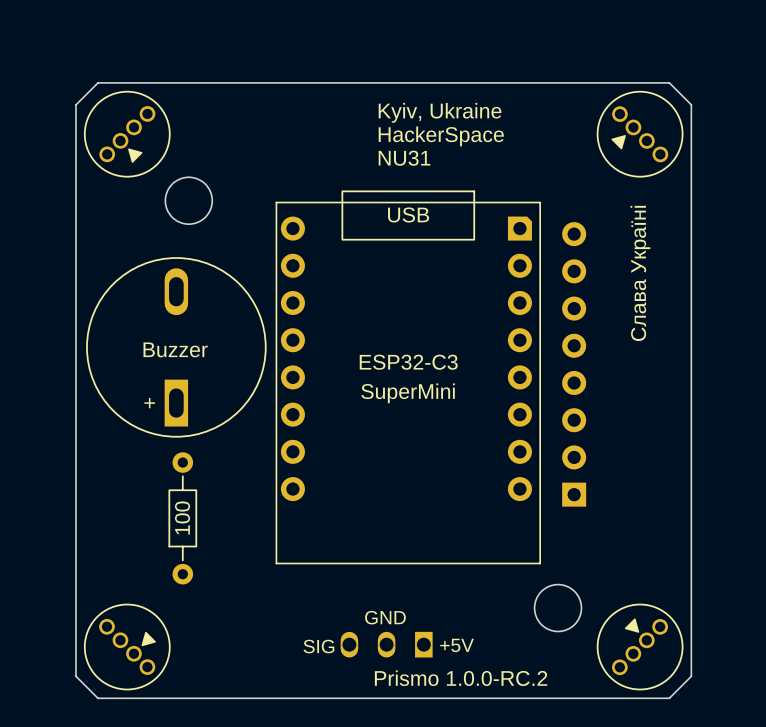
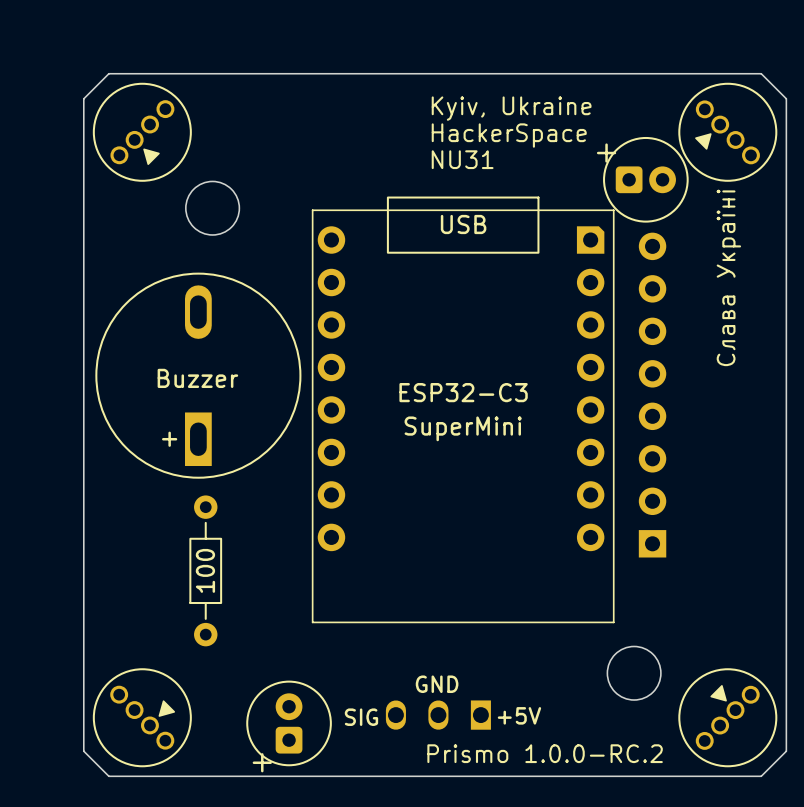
part: none -> (642, 179)
part: none -> (289, 726)

